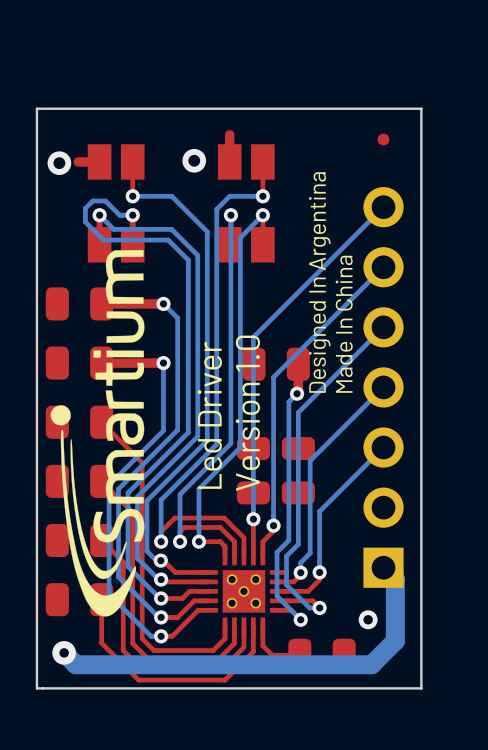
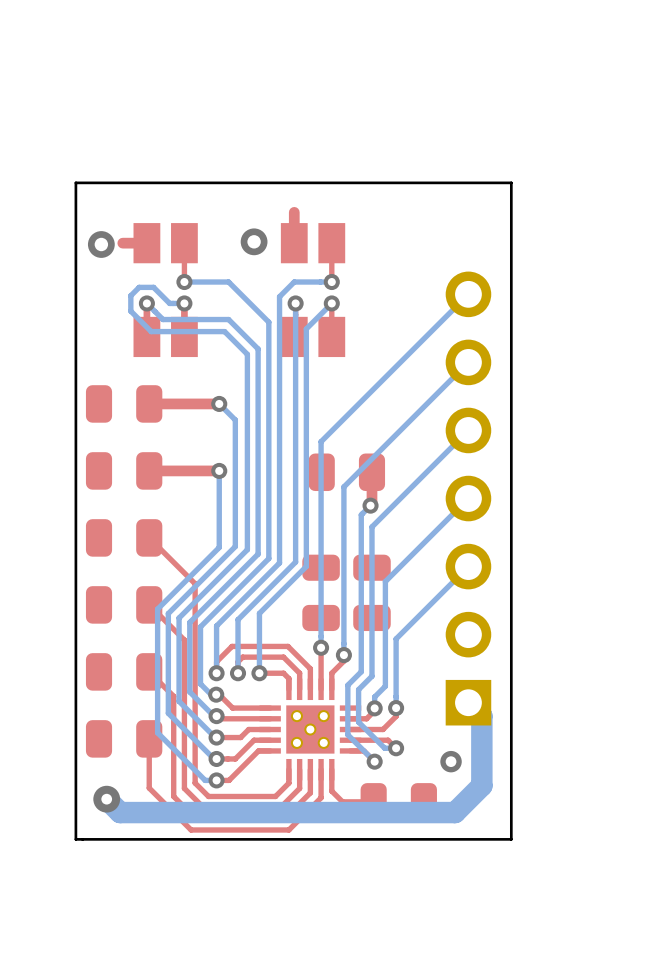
part: (383, 139) -> none
drawing: [50, 250, 145, 617] -> none
text: Designed In Argentina (319, 282) -> none
text: Made In China (344, 324) -> none
text: Version 1.0 (247, 413) -> none
text: Led Driver (209, 415) -> none

